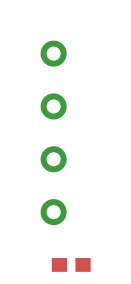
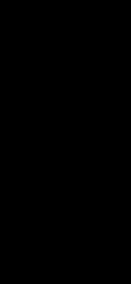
part: (53, 53) -> none
part: (53, 106) -> none
part: (53, 159) -> none
part: (53, 212) -> none
part: (71, 264) -> none

